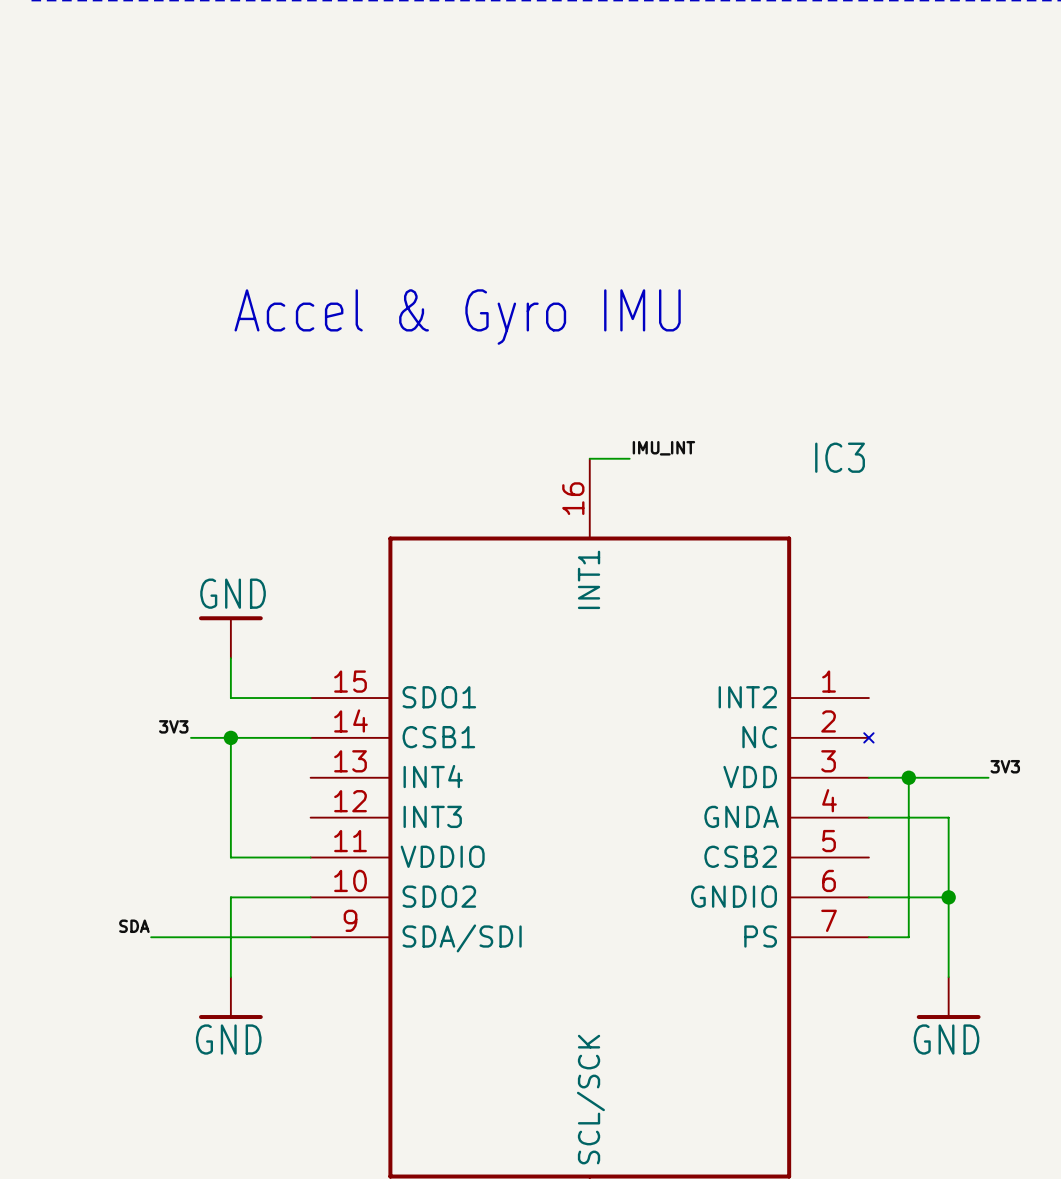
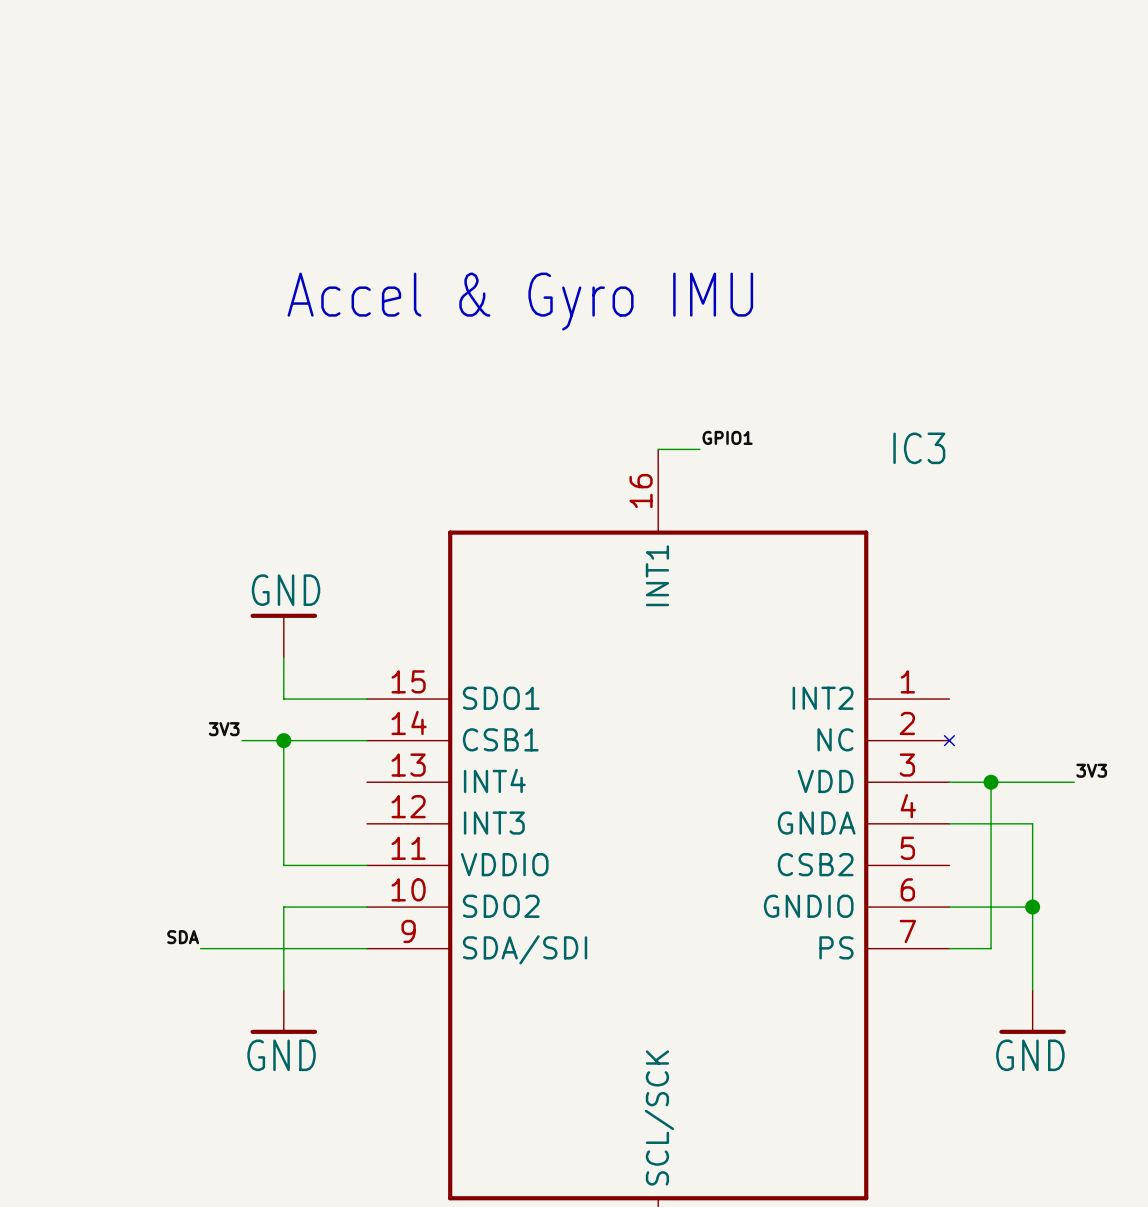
label: IMU_INT (663, 448) -> GPIO1 (727, 437)

